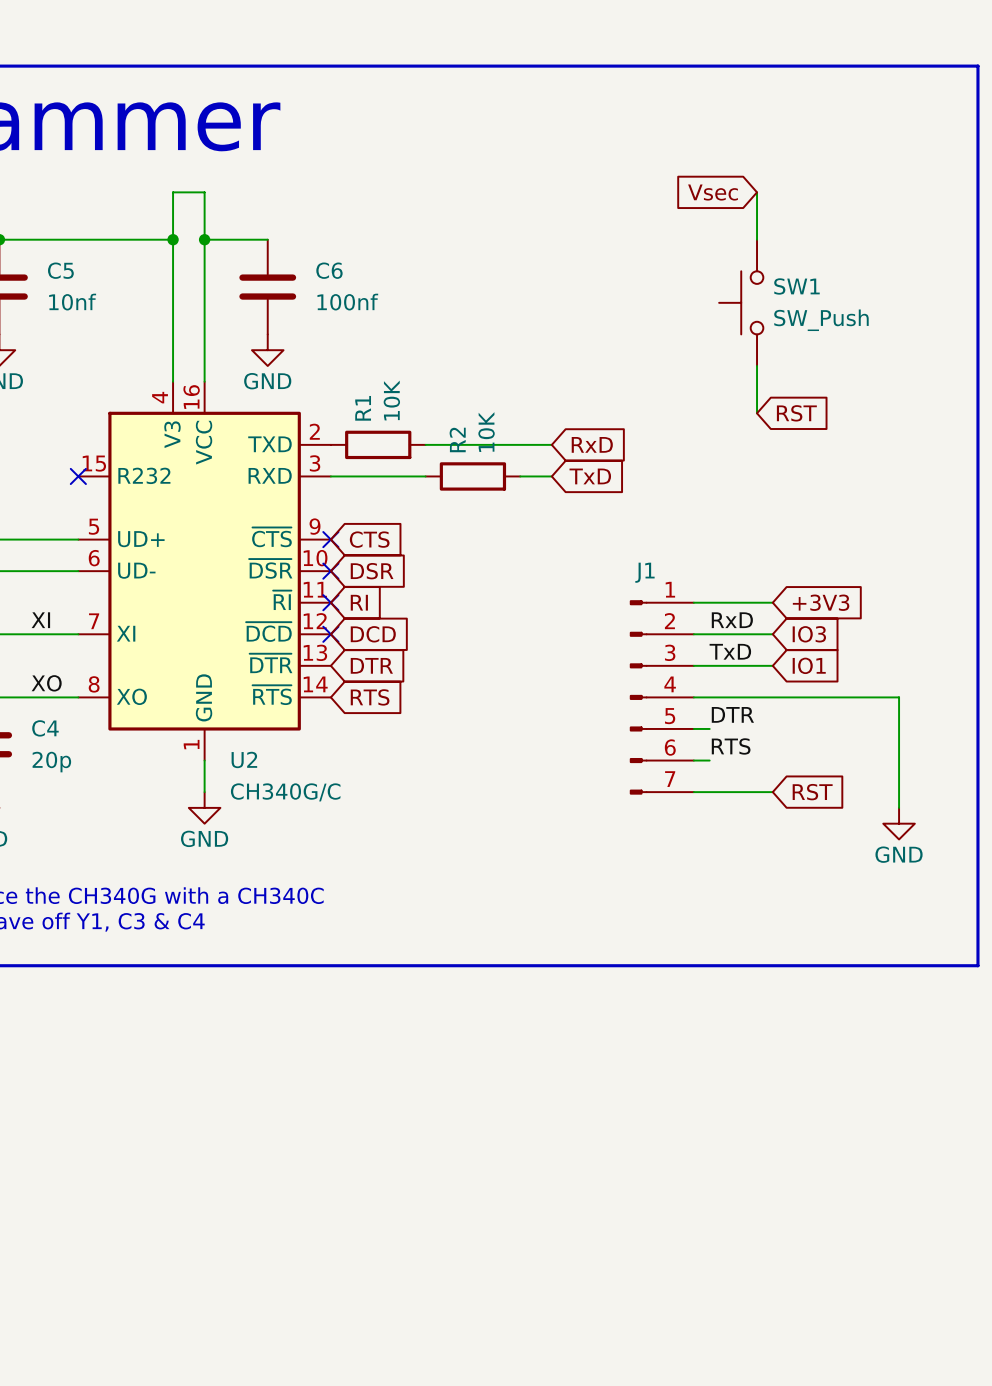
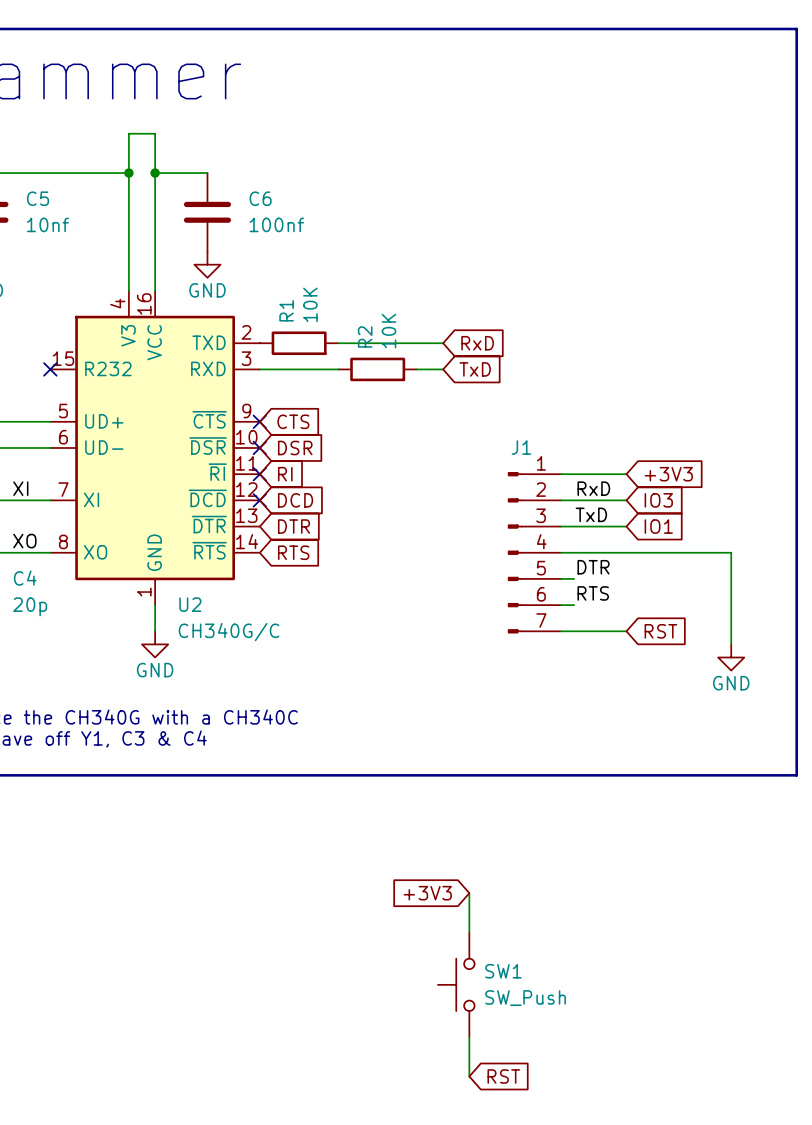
global label: Vsec (713, 192) -> none
wire: (757, 192) (757, 239) -> none
SW1 position: (741, 302) -> (456, 984)
wire: (757, 365) (757, 413) -> none
global label: RST (796, 413) -> none
global label: none -> +3V3 (427, 893)
wire: none -> (469, 893) (469, 932)
wire: none -> (469, 1037) (469, 1076)
global label: none -> RST (503, 1076)

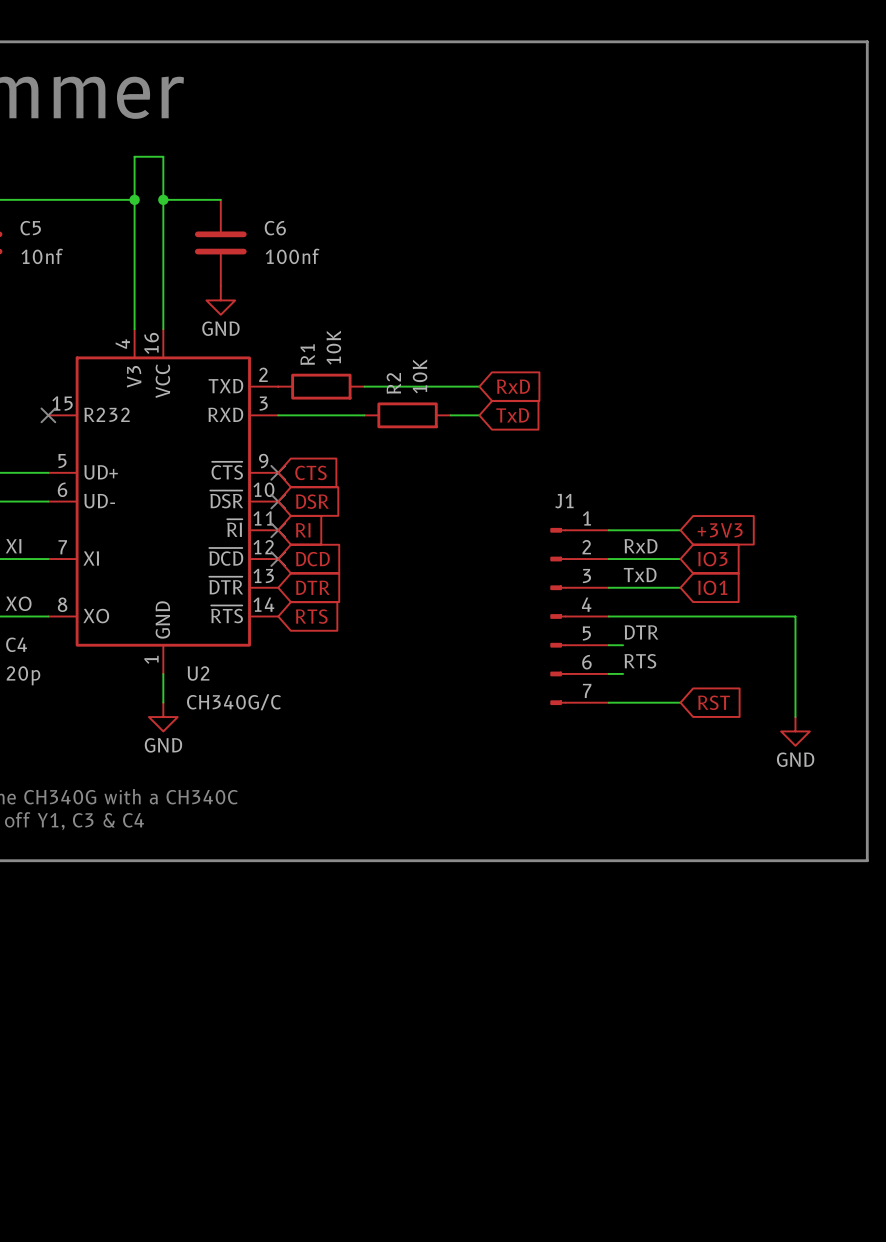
global label: +3V3 (427, 893) -> none
wire: (469, 893) (469, 932) -> none
SW1: SW_Push (456, 984) -> none
wire: (469, 1037) (469, 1076) -> none
global label: RST (503, 1076) -> none

